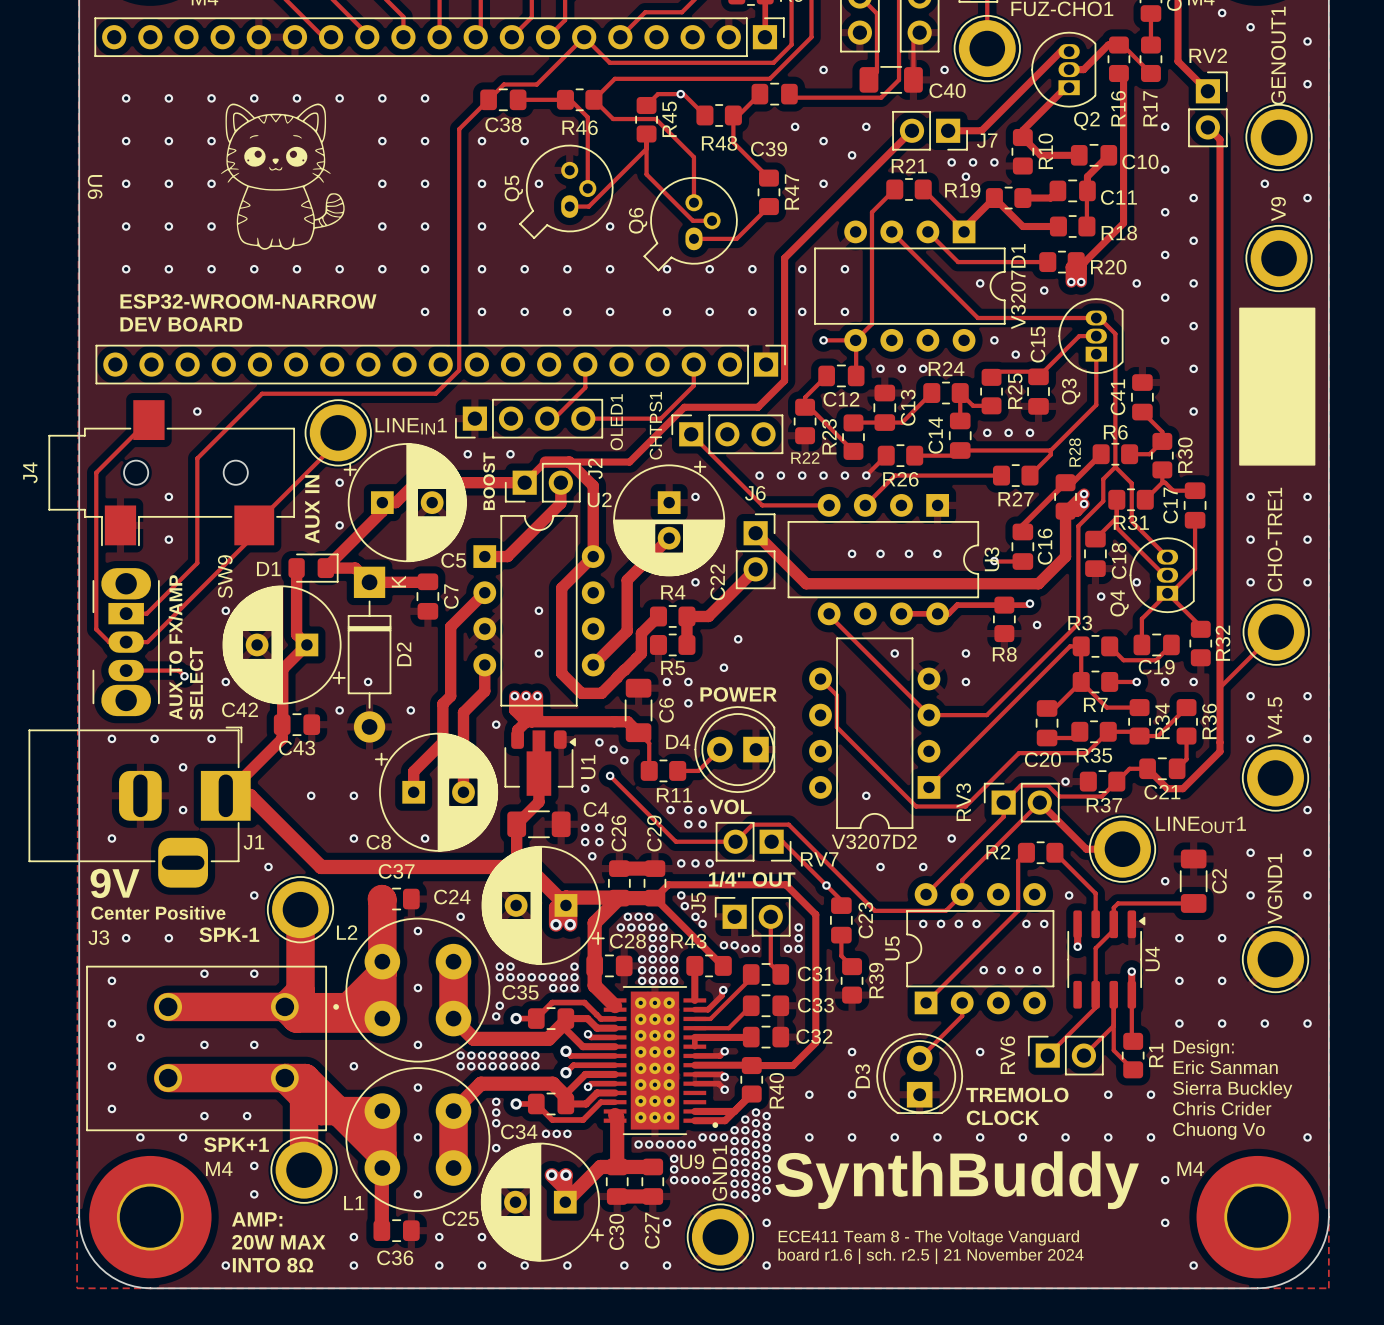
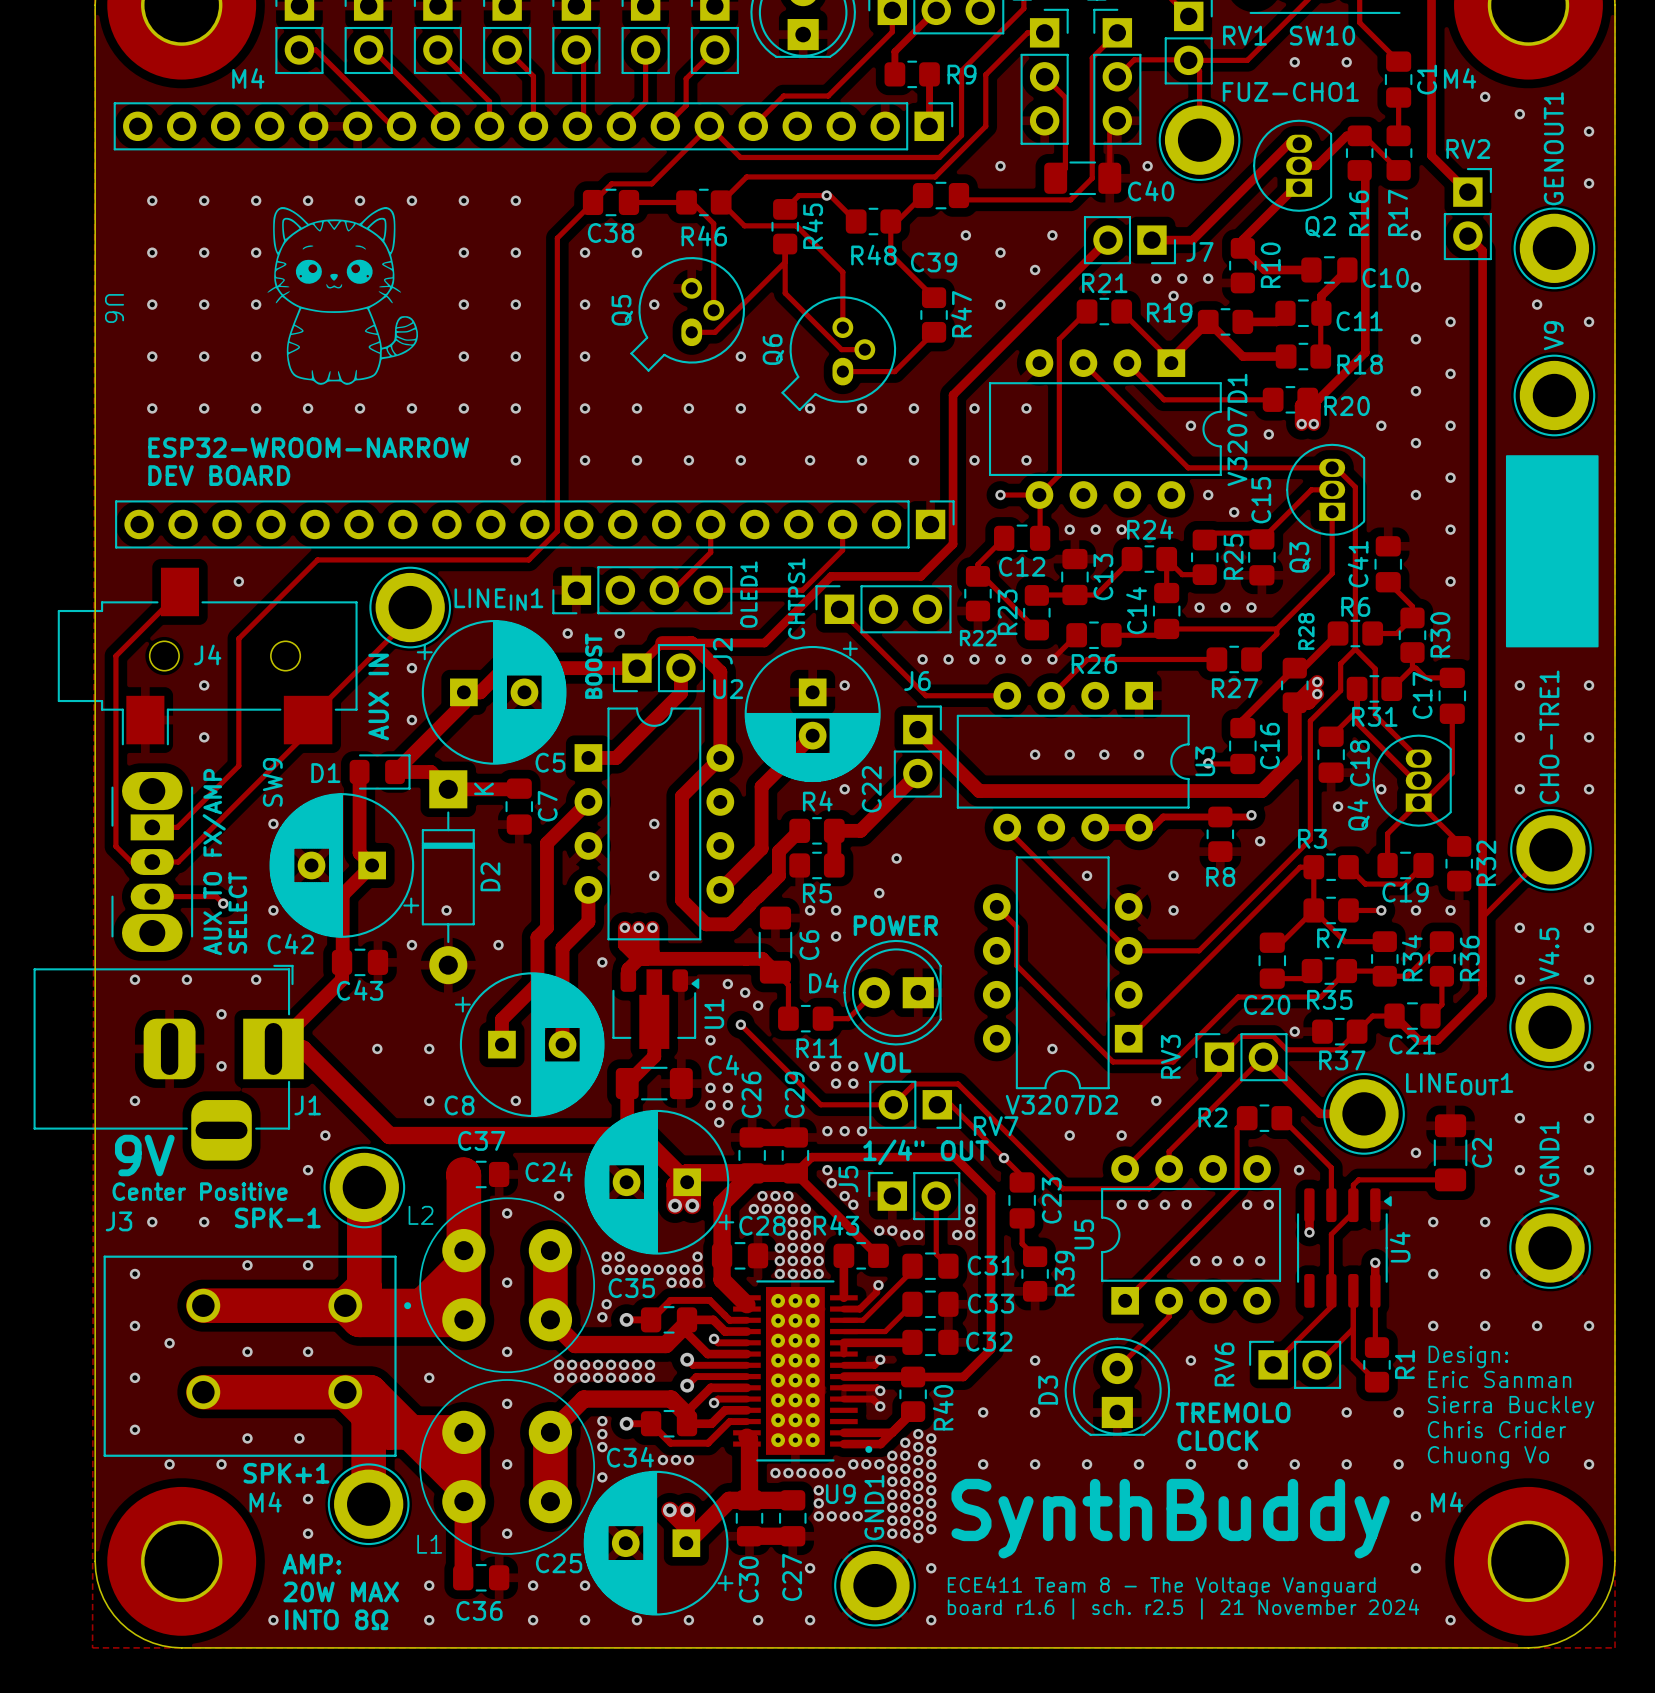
J4 name rotation: 0° (30, 472) -> 90° clockwise (207, 654)
J4 name position: J4 (30, 472) -> J4 (207, 654)

